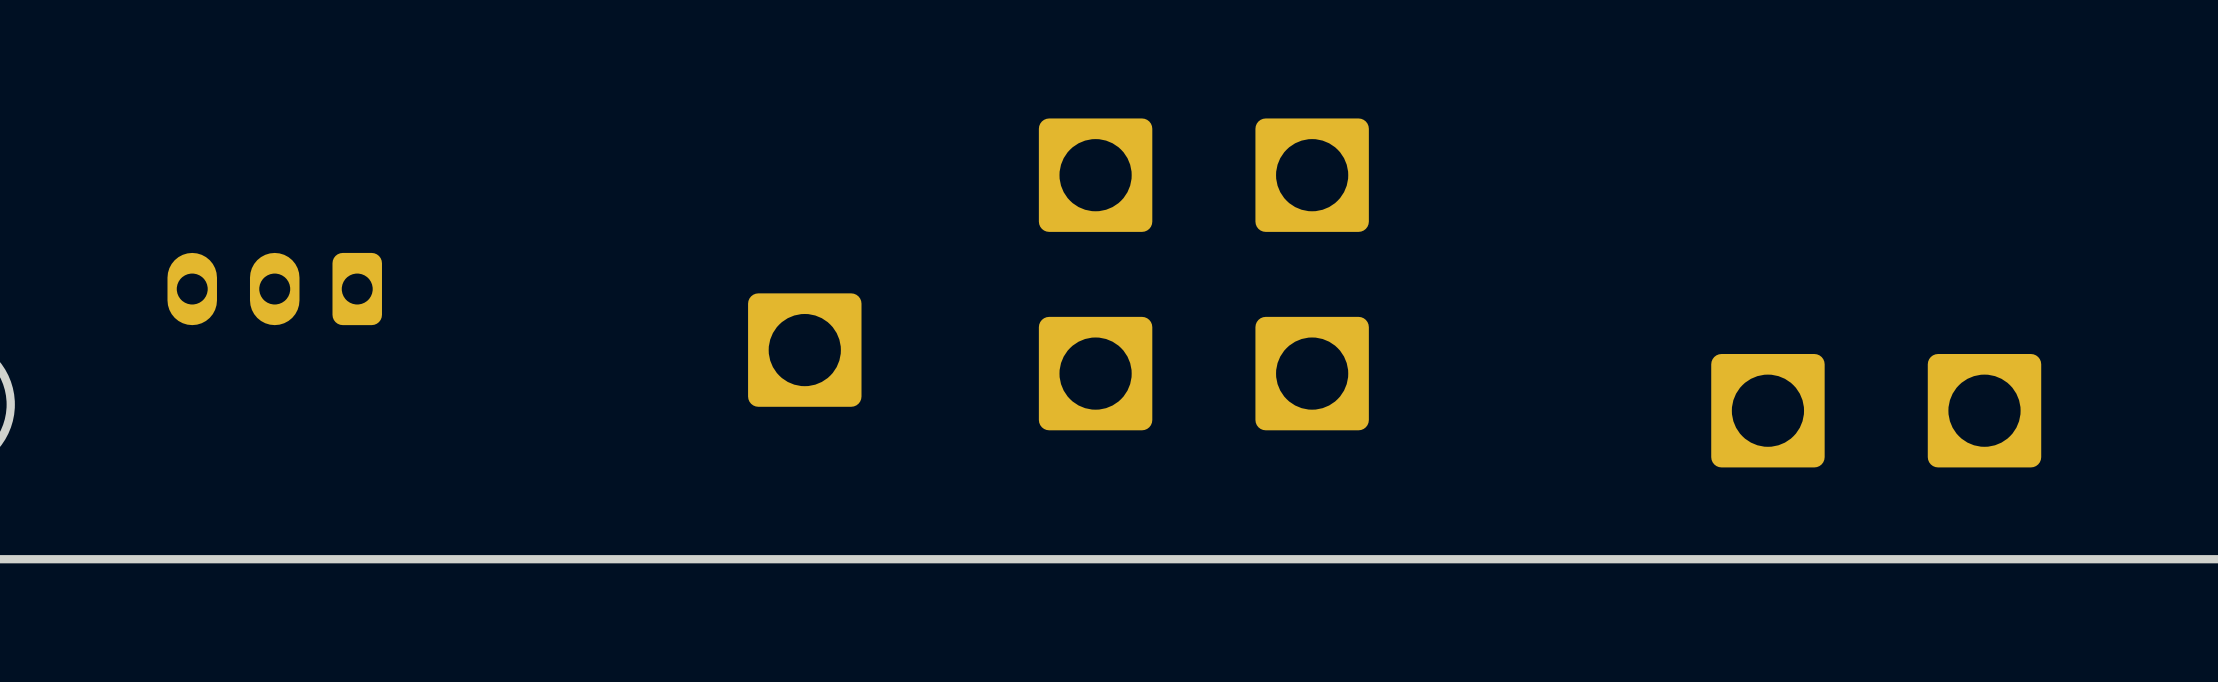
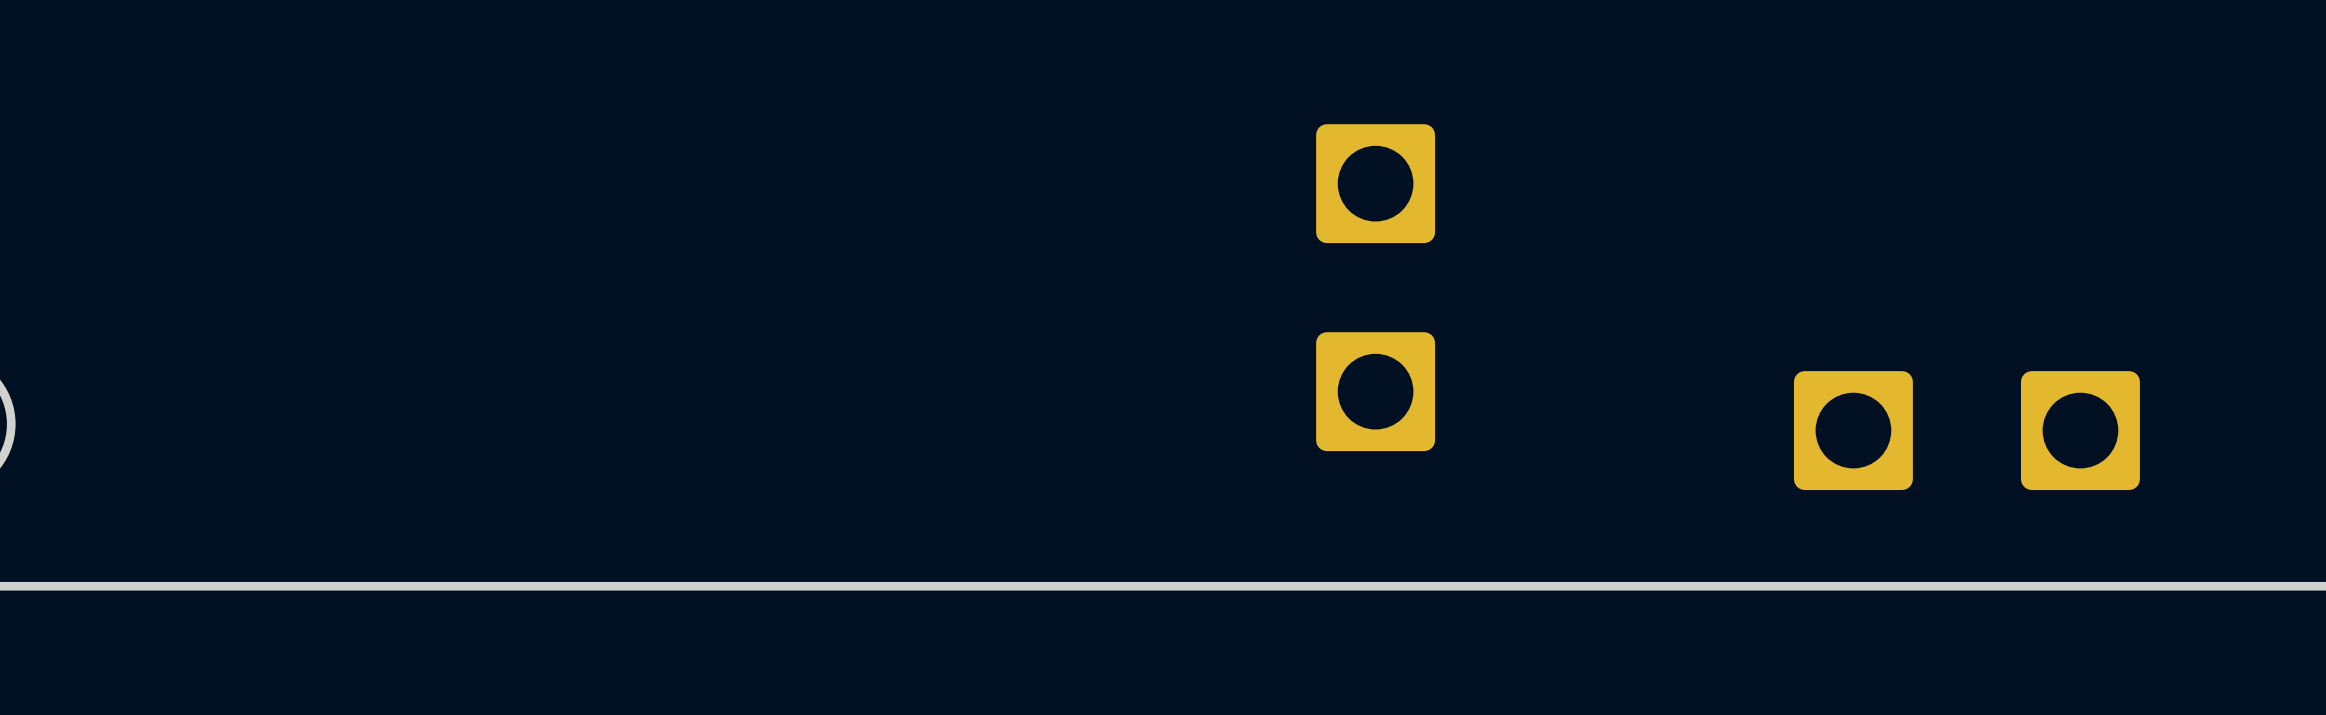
part: (1095, 175) -> none
part: (274, 289) -> none
part: (804, 350) -> none
part: (1095, 373) -> none

